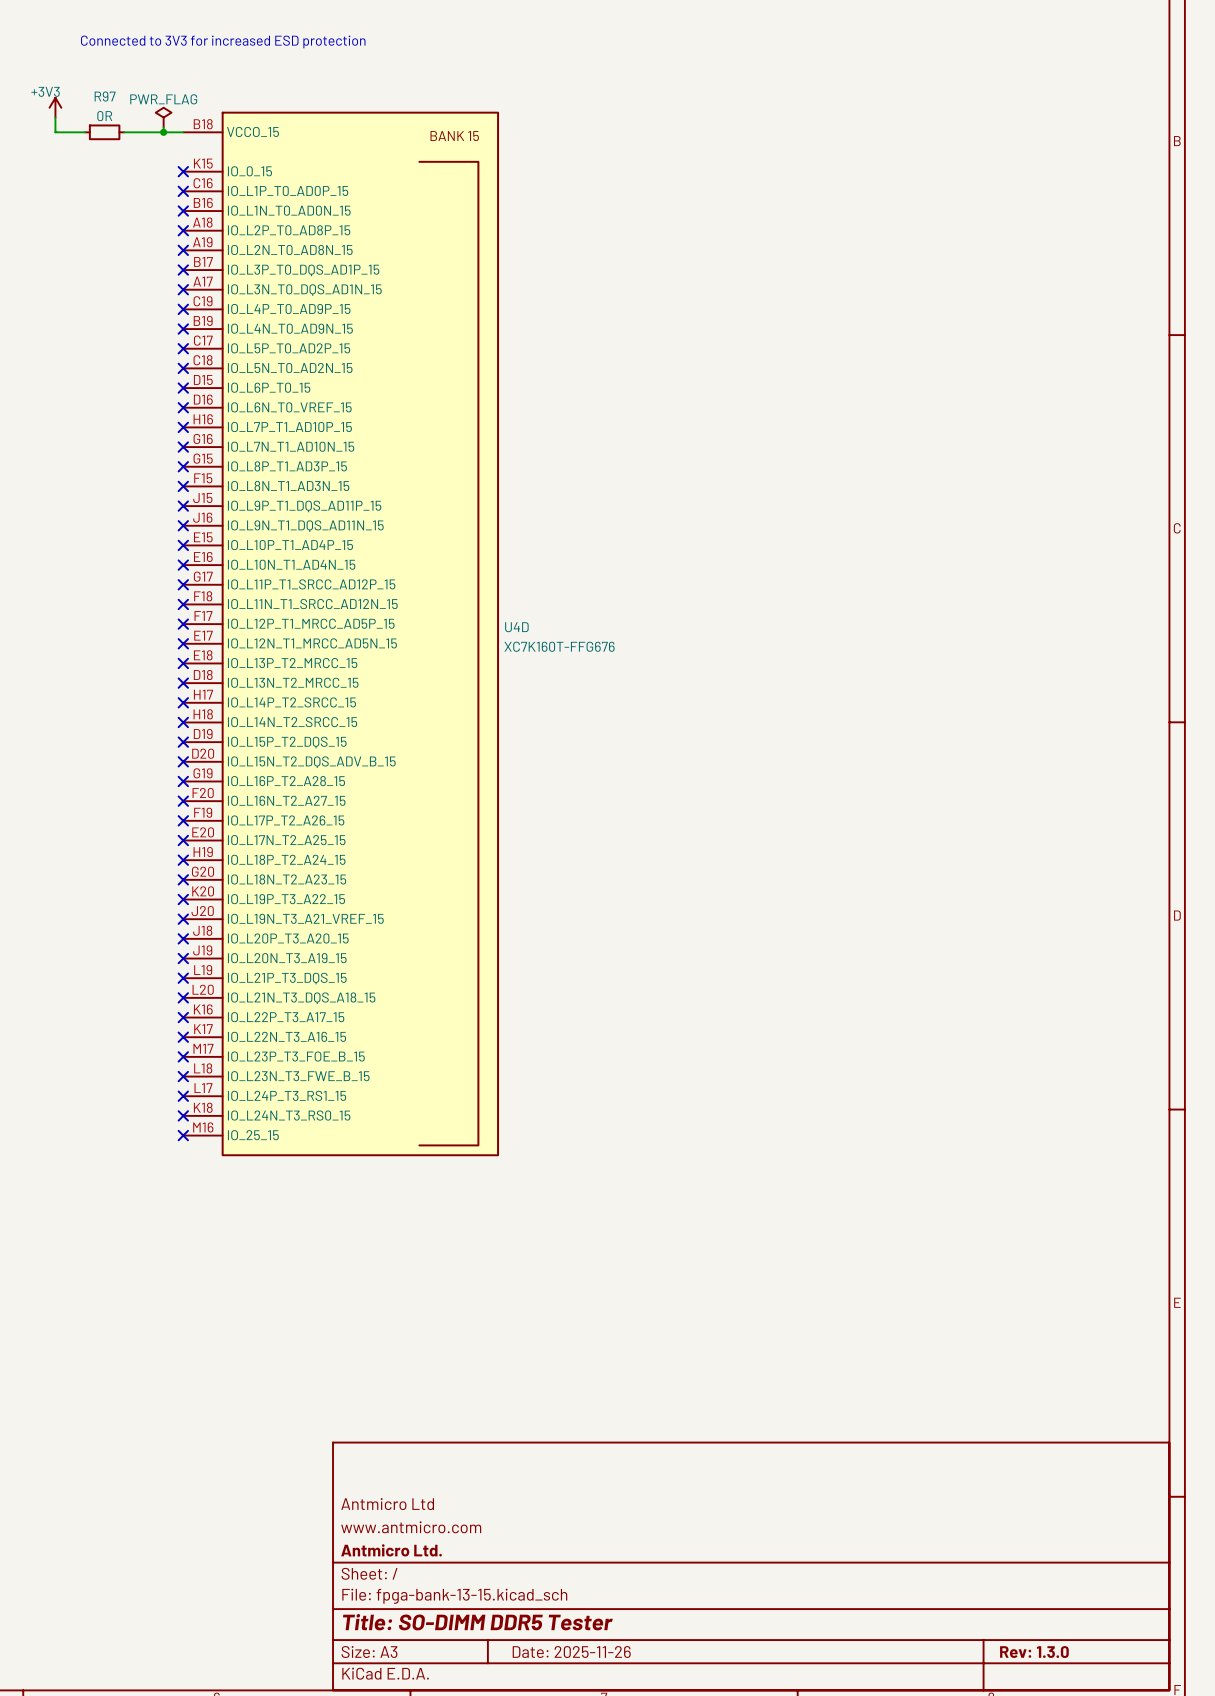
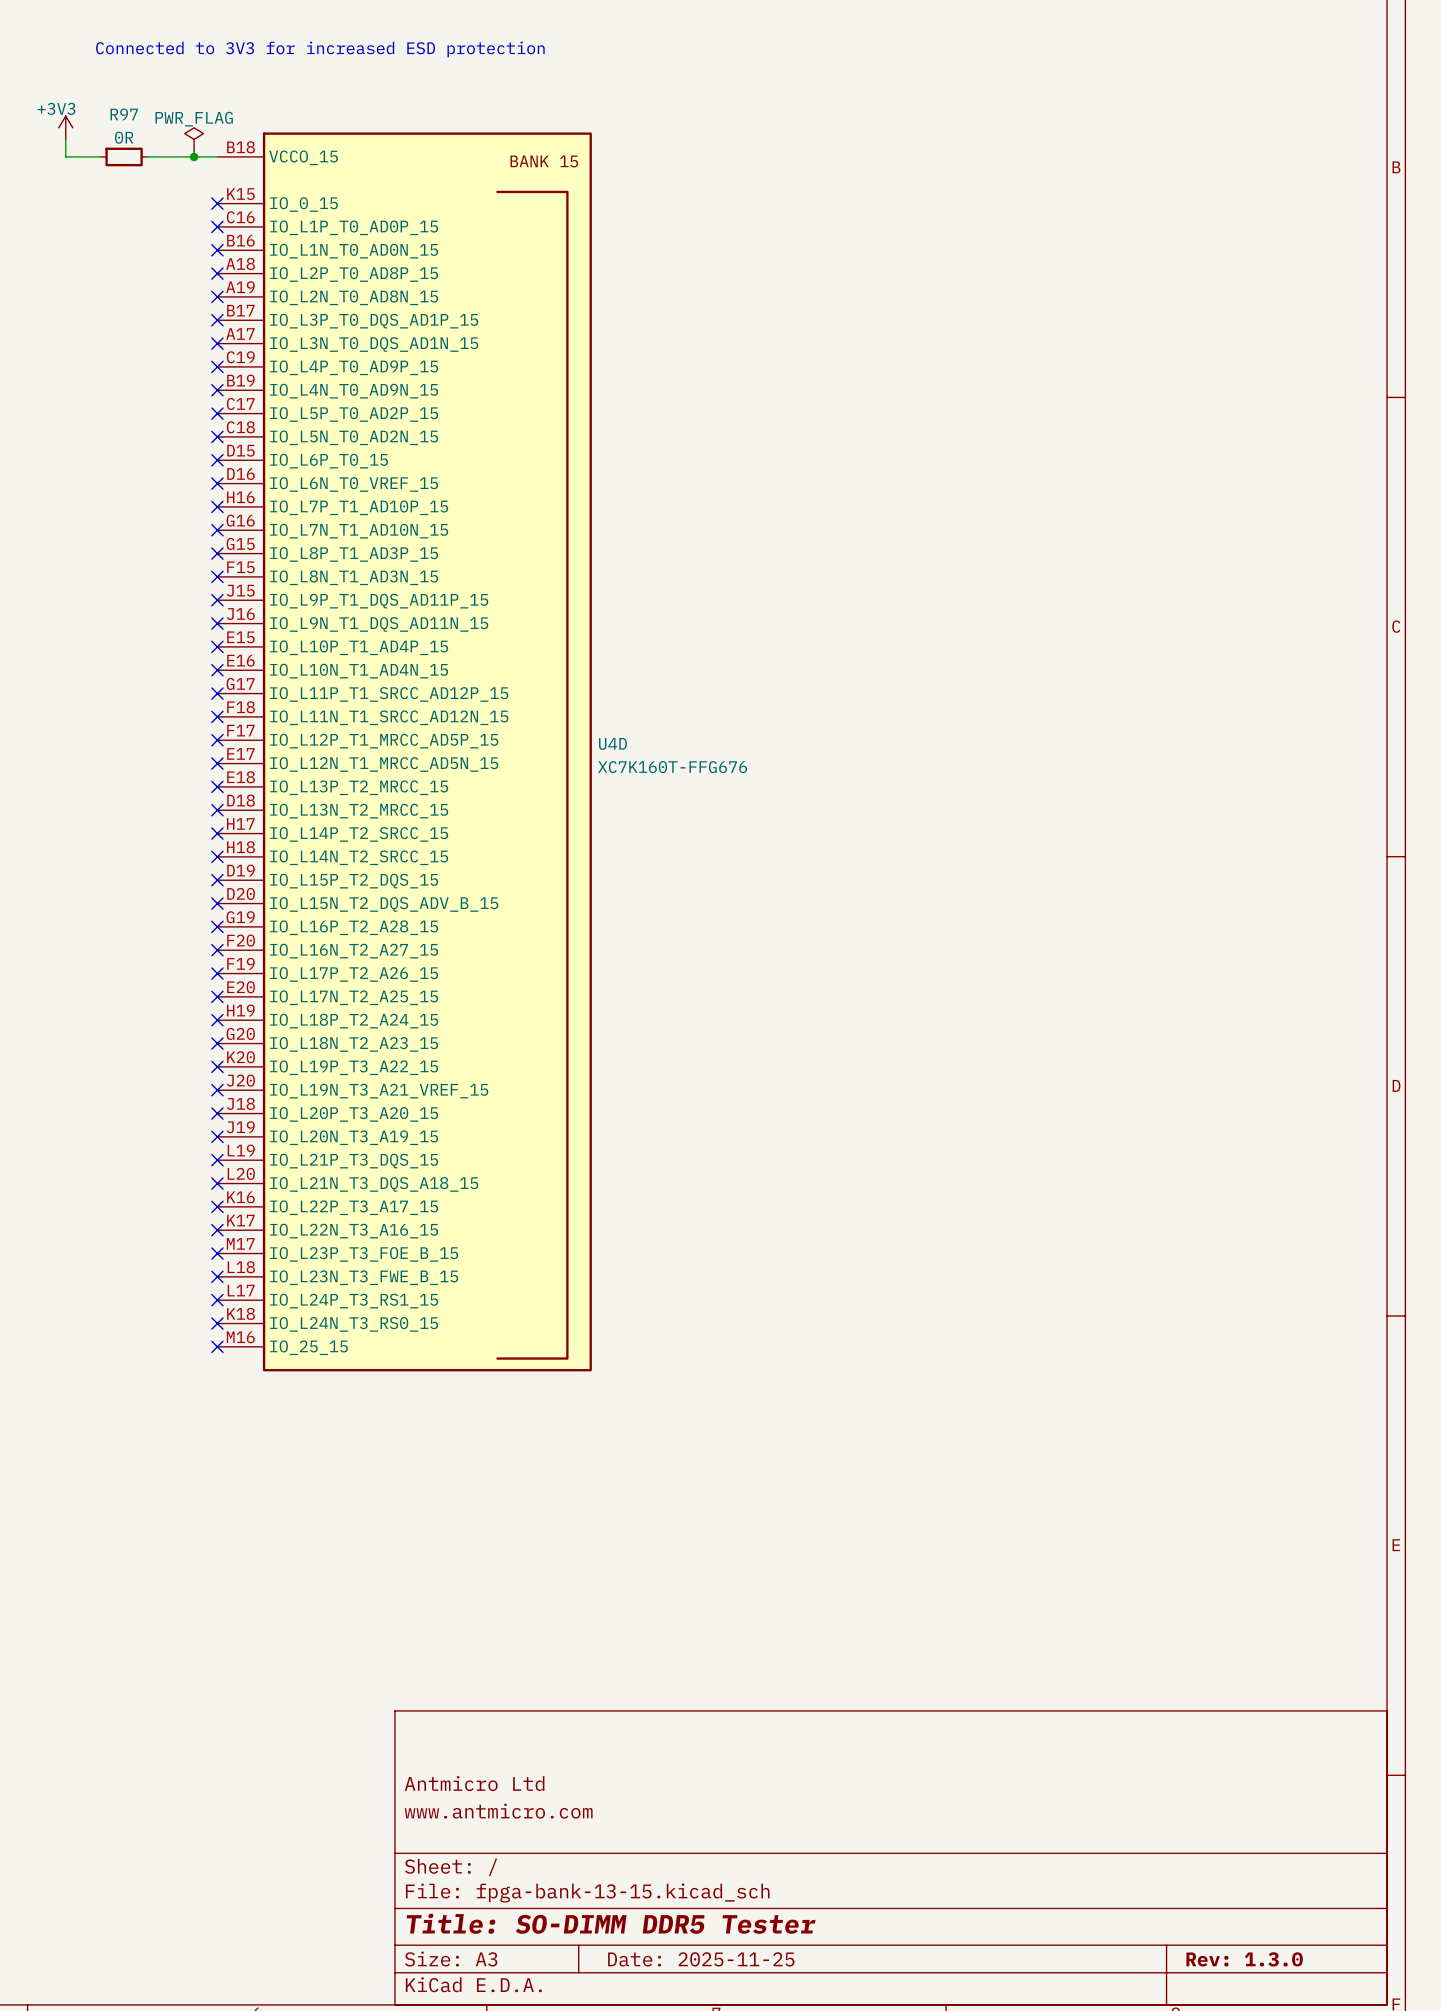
title block: Antmicro Ltd. (391, 1550) -> none
title block: Date: 2025-11-26 (571, 1652) -> Date: 2025-11-25 (701, 1959)

